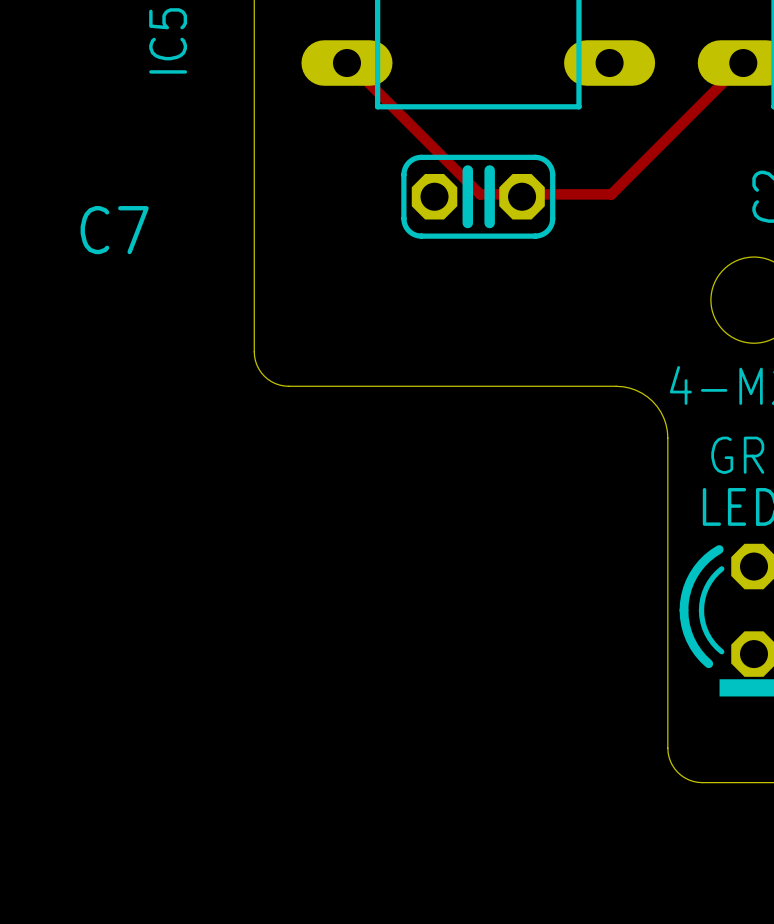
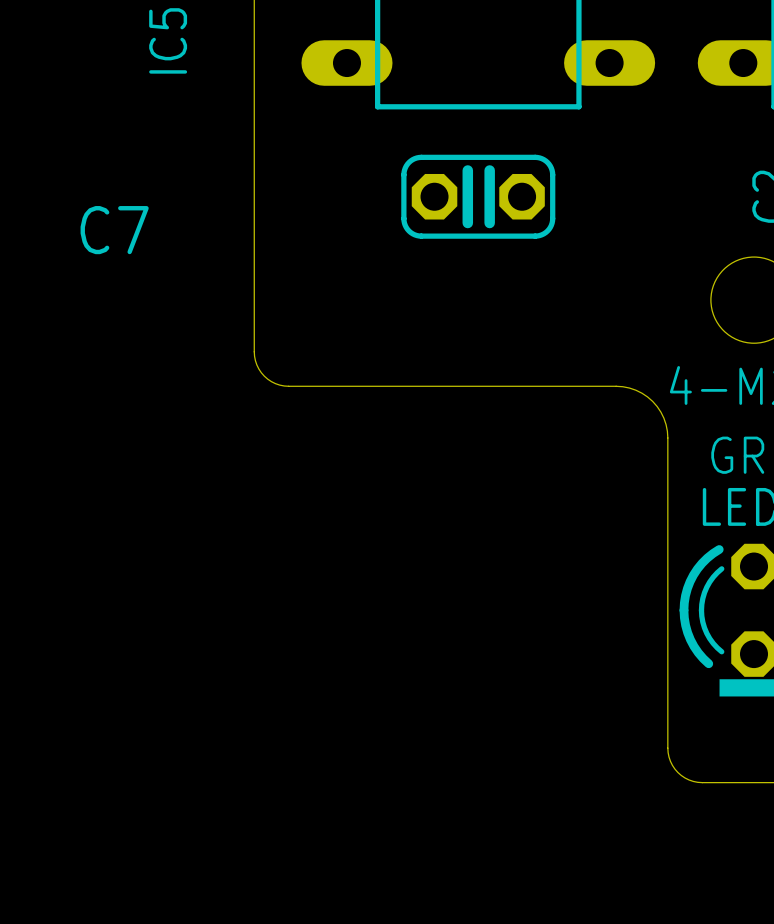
track: (346, 63) (480, 194) (519, 194) (522, 196) (524, 194) (611, 194) (742, 63) -> none

